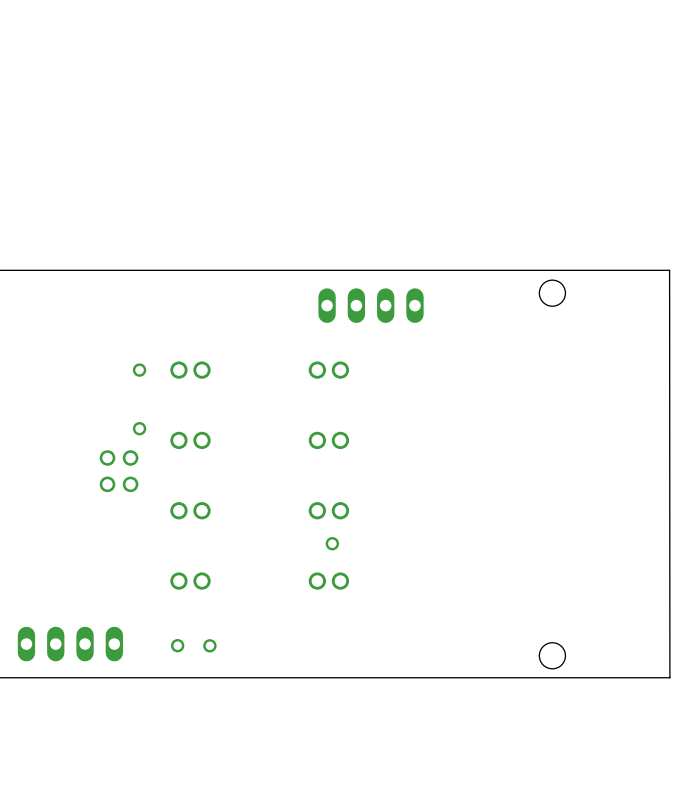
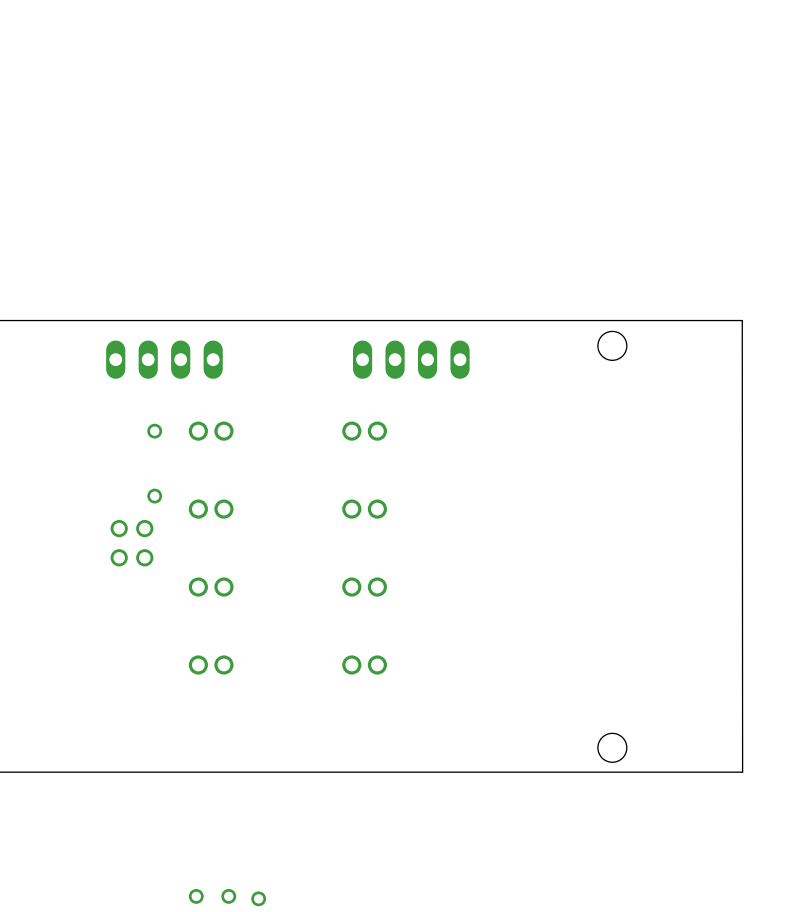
part: none -> (164, 359)
part: (332, 543) -> none
part: (70, 644) -> none
part: (177, 645) -> none
part: (209, 645) -> none
part: none -> (196, 896)
part: none -> (228, 896)
part: none -> (258, 898)

